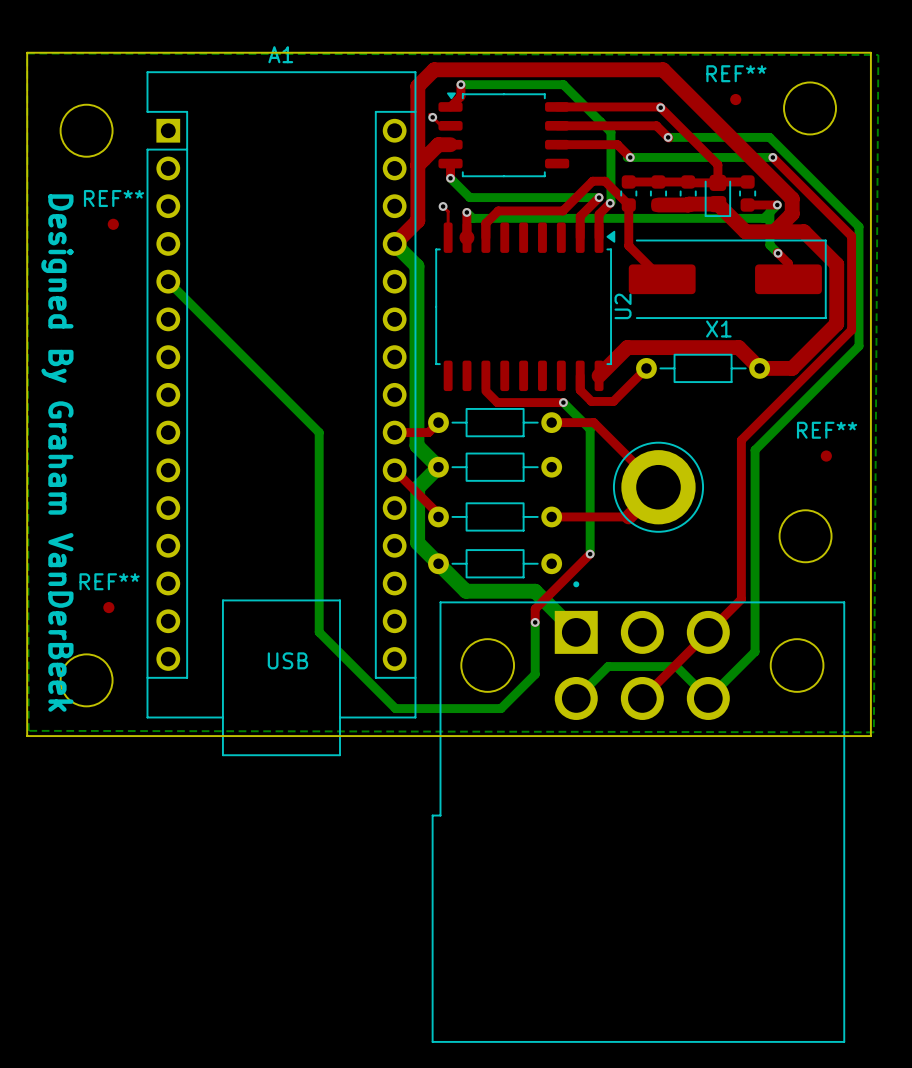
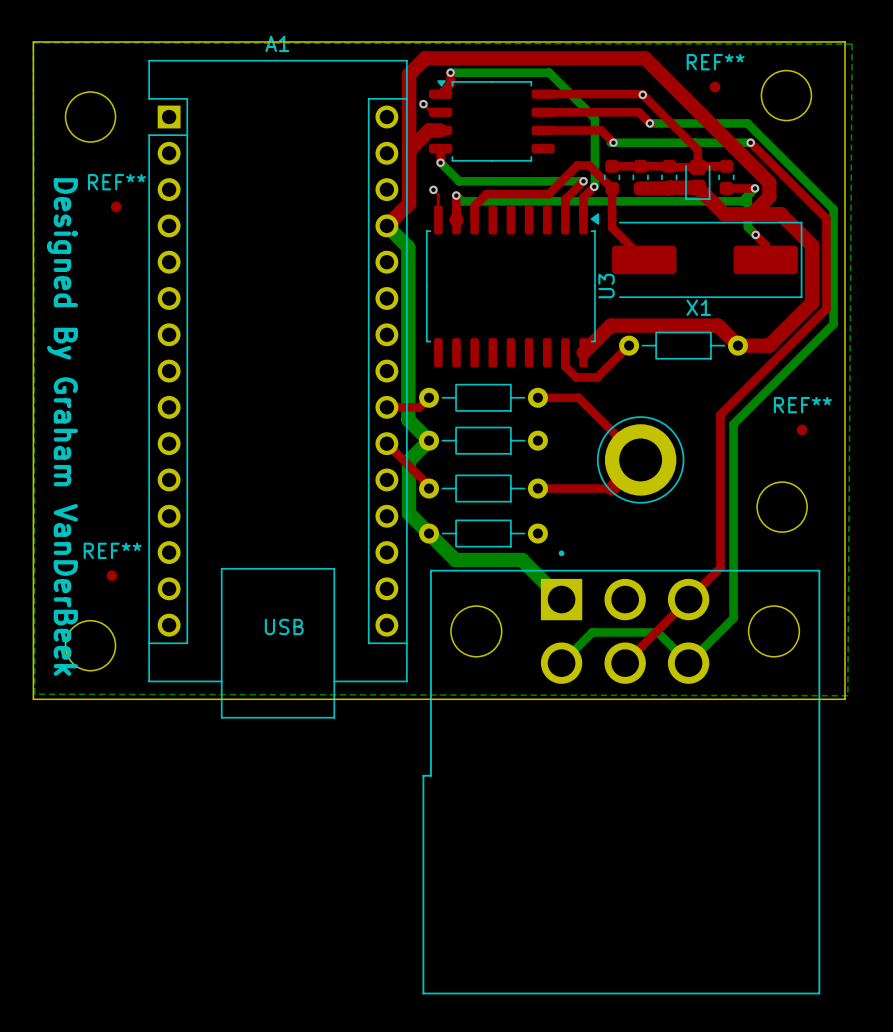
bottom track: (168, 281) (319, 432) (319, 632) (395, 708) (501, 708) (535, 674) (535, 622) -> none
U2 name: U2 (623, 306) -> U3 (606, 285)
top track: (485, 375) (485, 391) (497, 402) (563, 402) -> none
bottom track: (563, 402) (590, 429) (590, 554) -> none
via: (563, 402) -> none
top track: (590, 554) (535, 609) (535, 622) -> none
via: (590, 554) -> none
via: (535, 622) -> none

